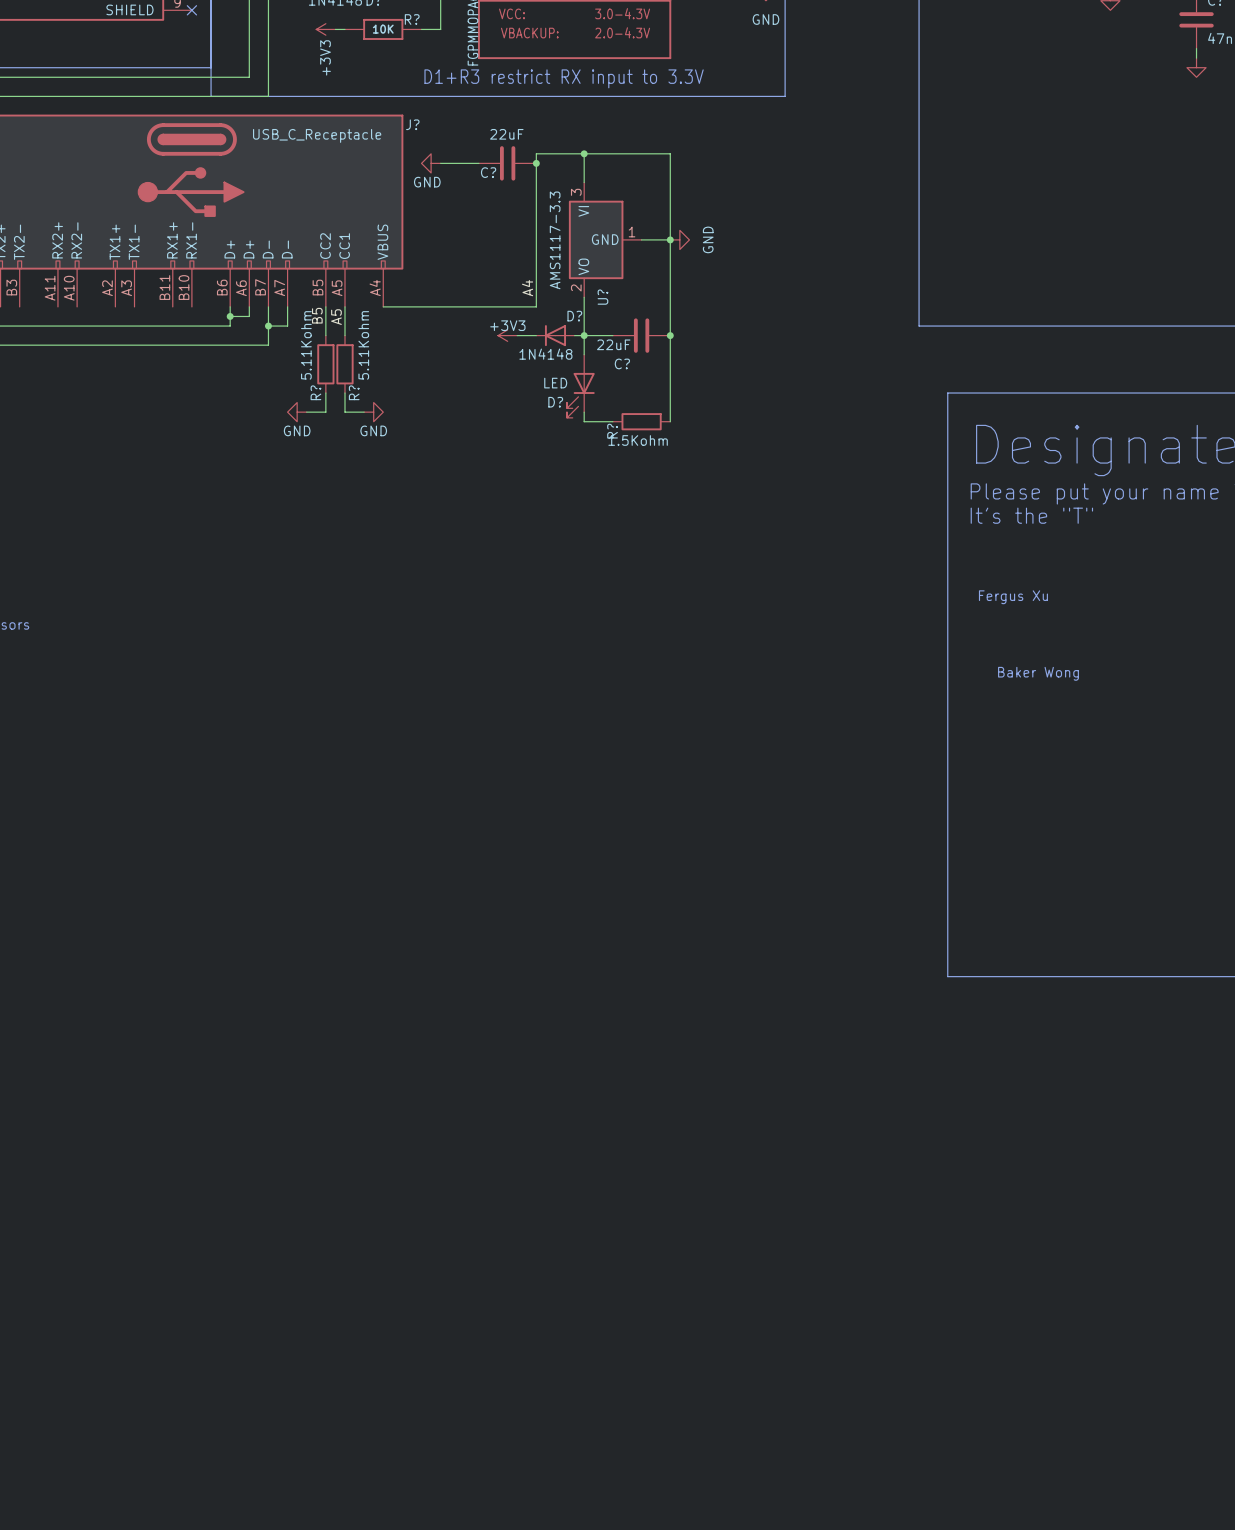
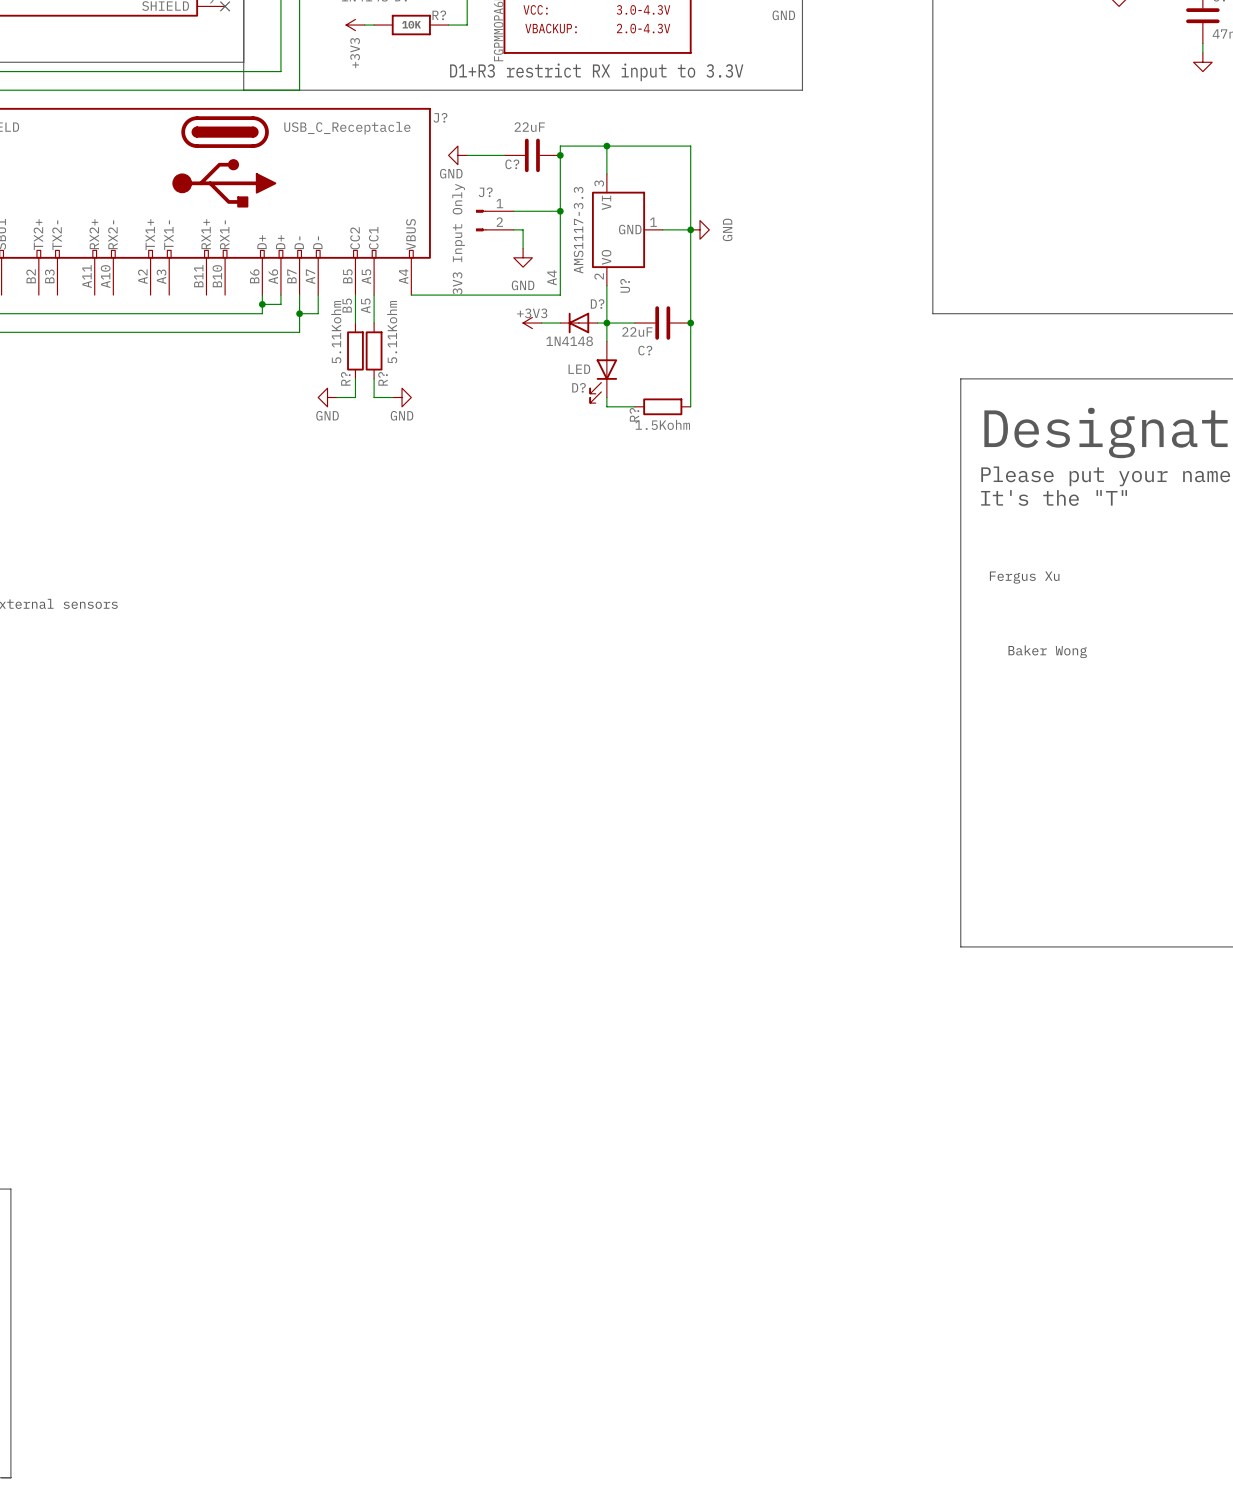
wire: none -> (513, 211) (560, 211)
junction: none -> (560, 211)
J?: none -> 3V3 Input Only (494, 220)
wire: none -> (513, 229) (523, 229) (523, 248)
power symbol: none -> GND (523, 257)

